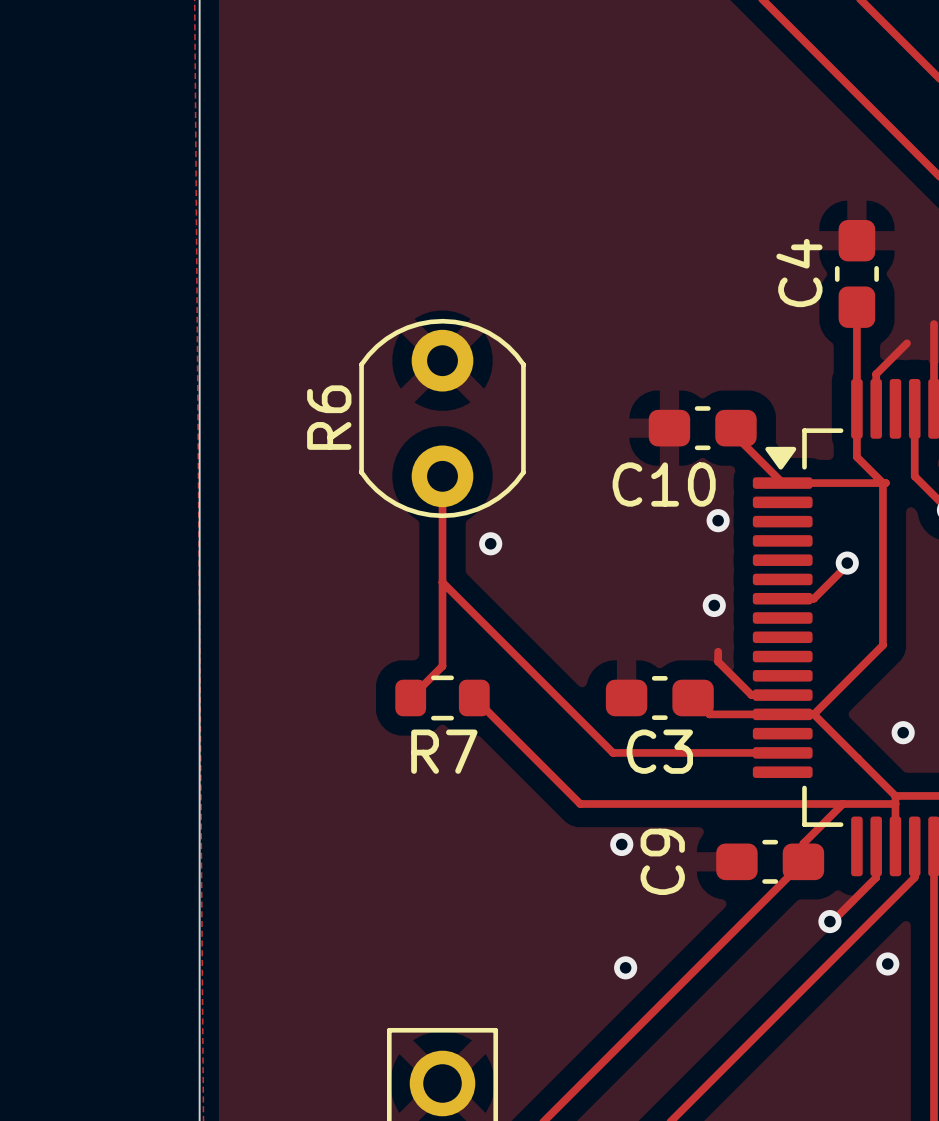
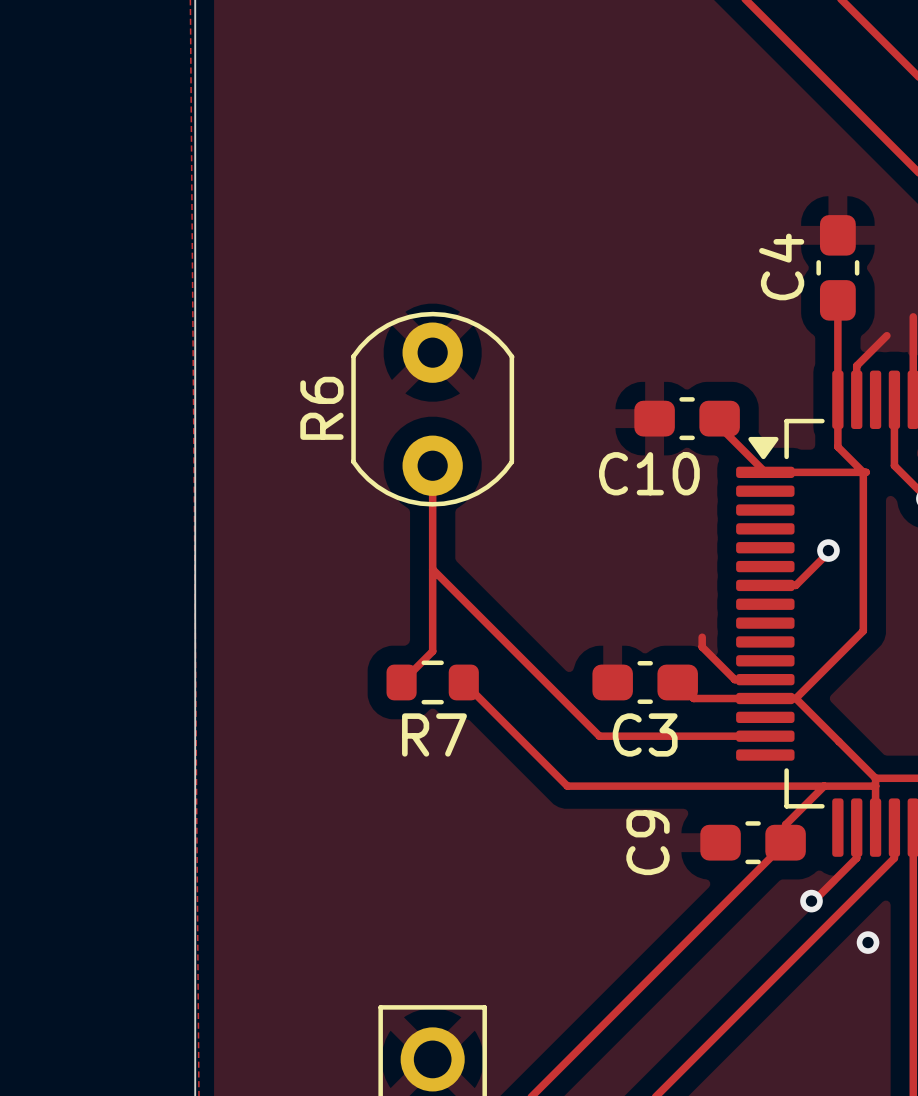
via: (718, 520) -> none
via: (490, 543) -> none
via: (714, 605) -> none
via: (903, 732) -> none
via: (621, 844) -> none
via: (625, 967) -> none

